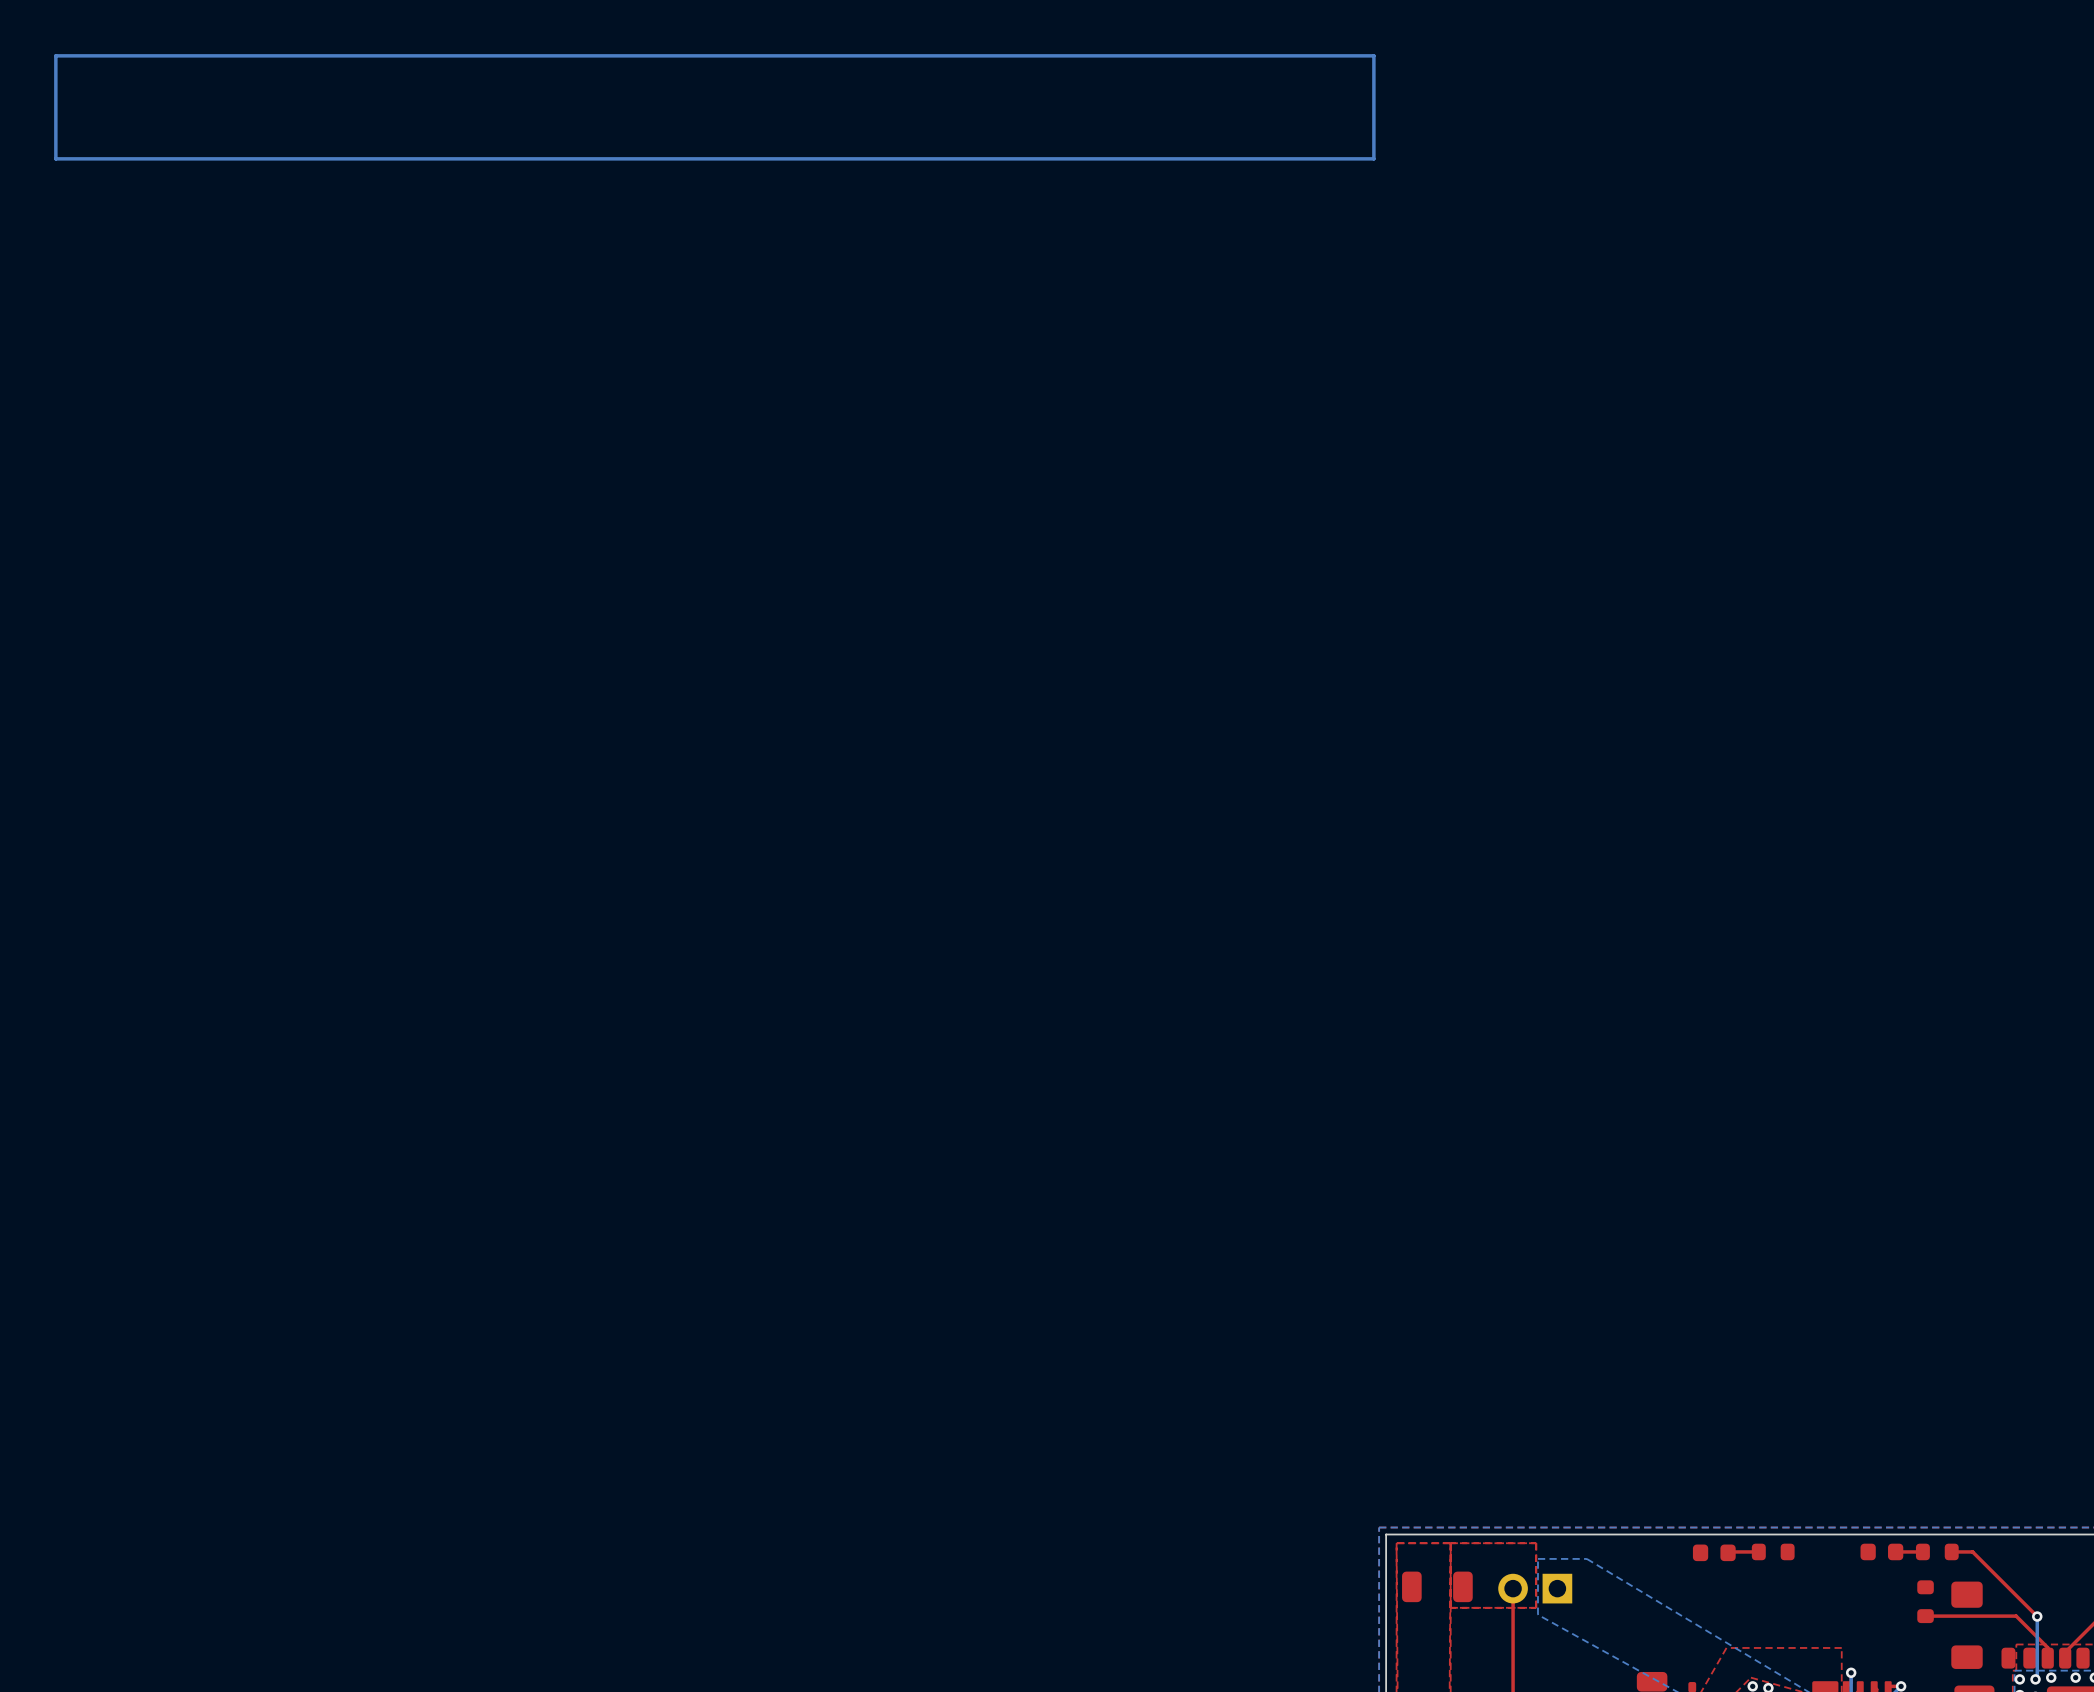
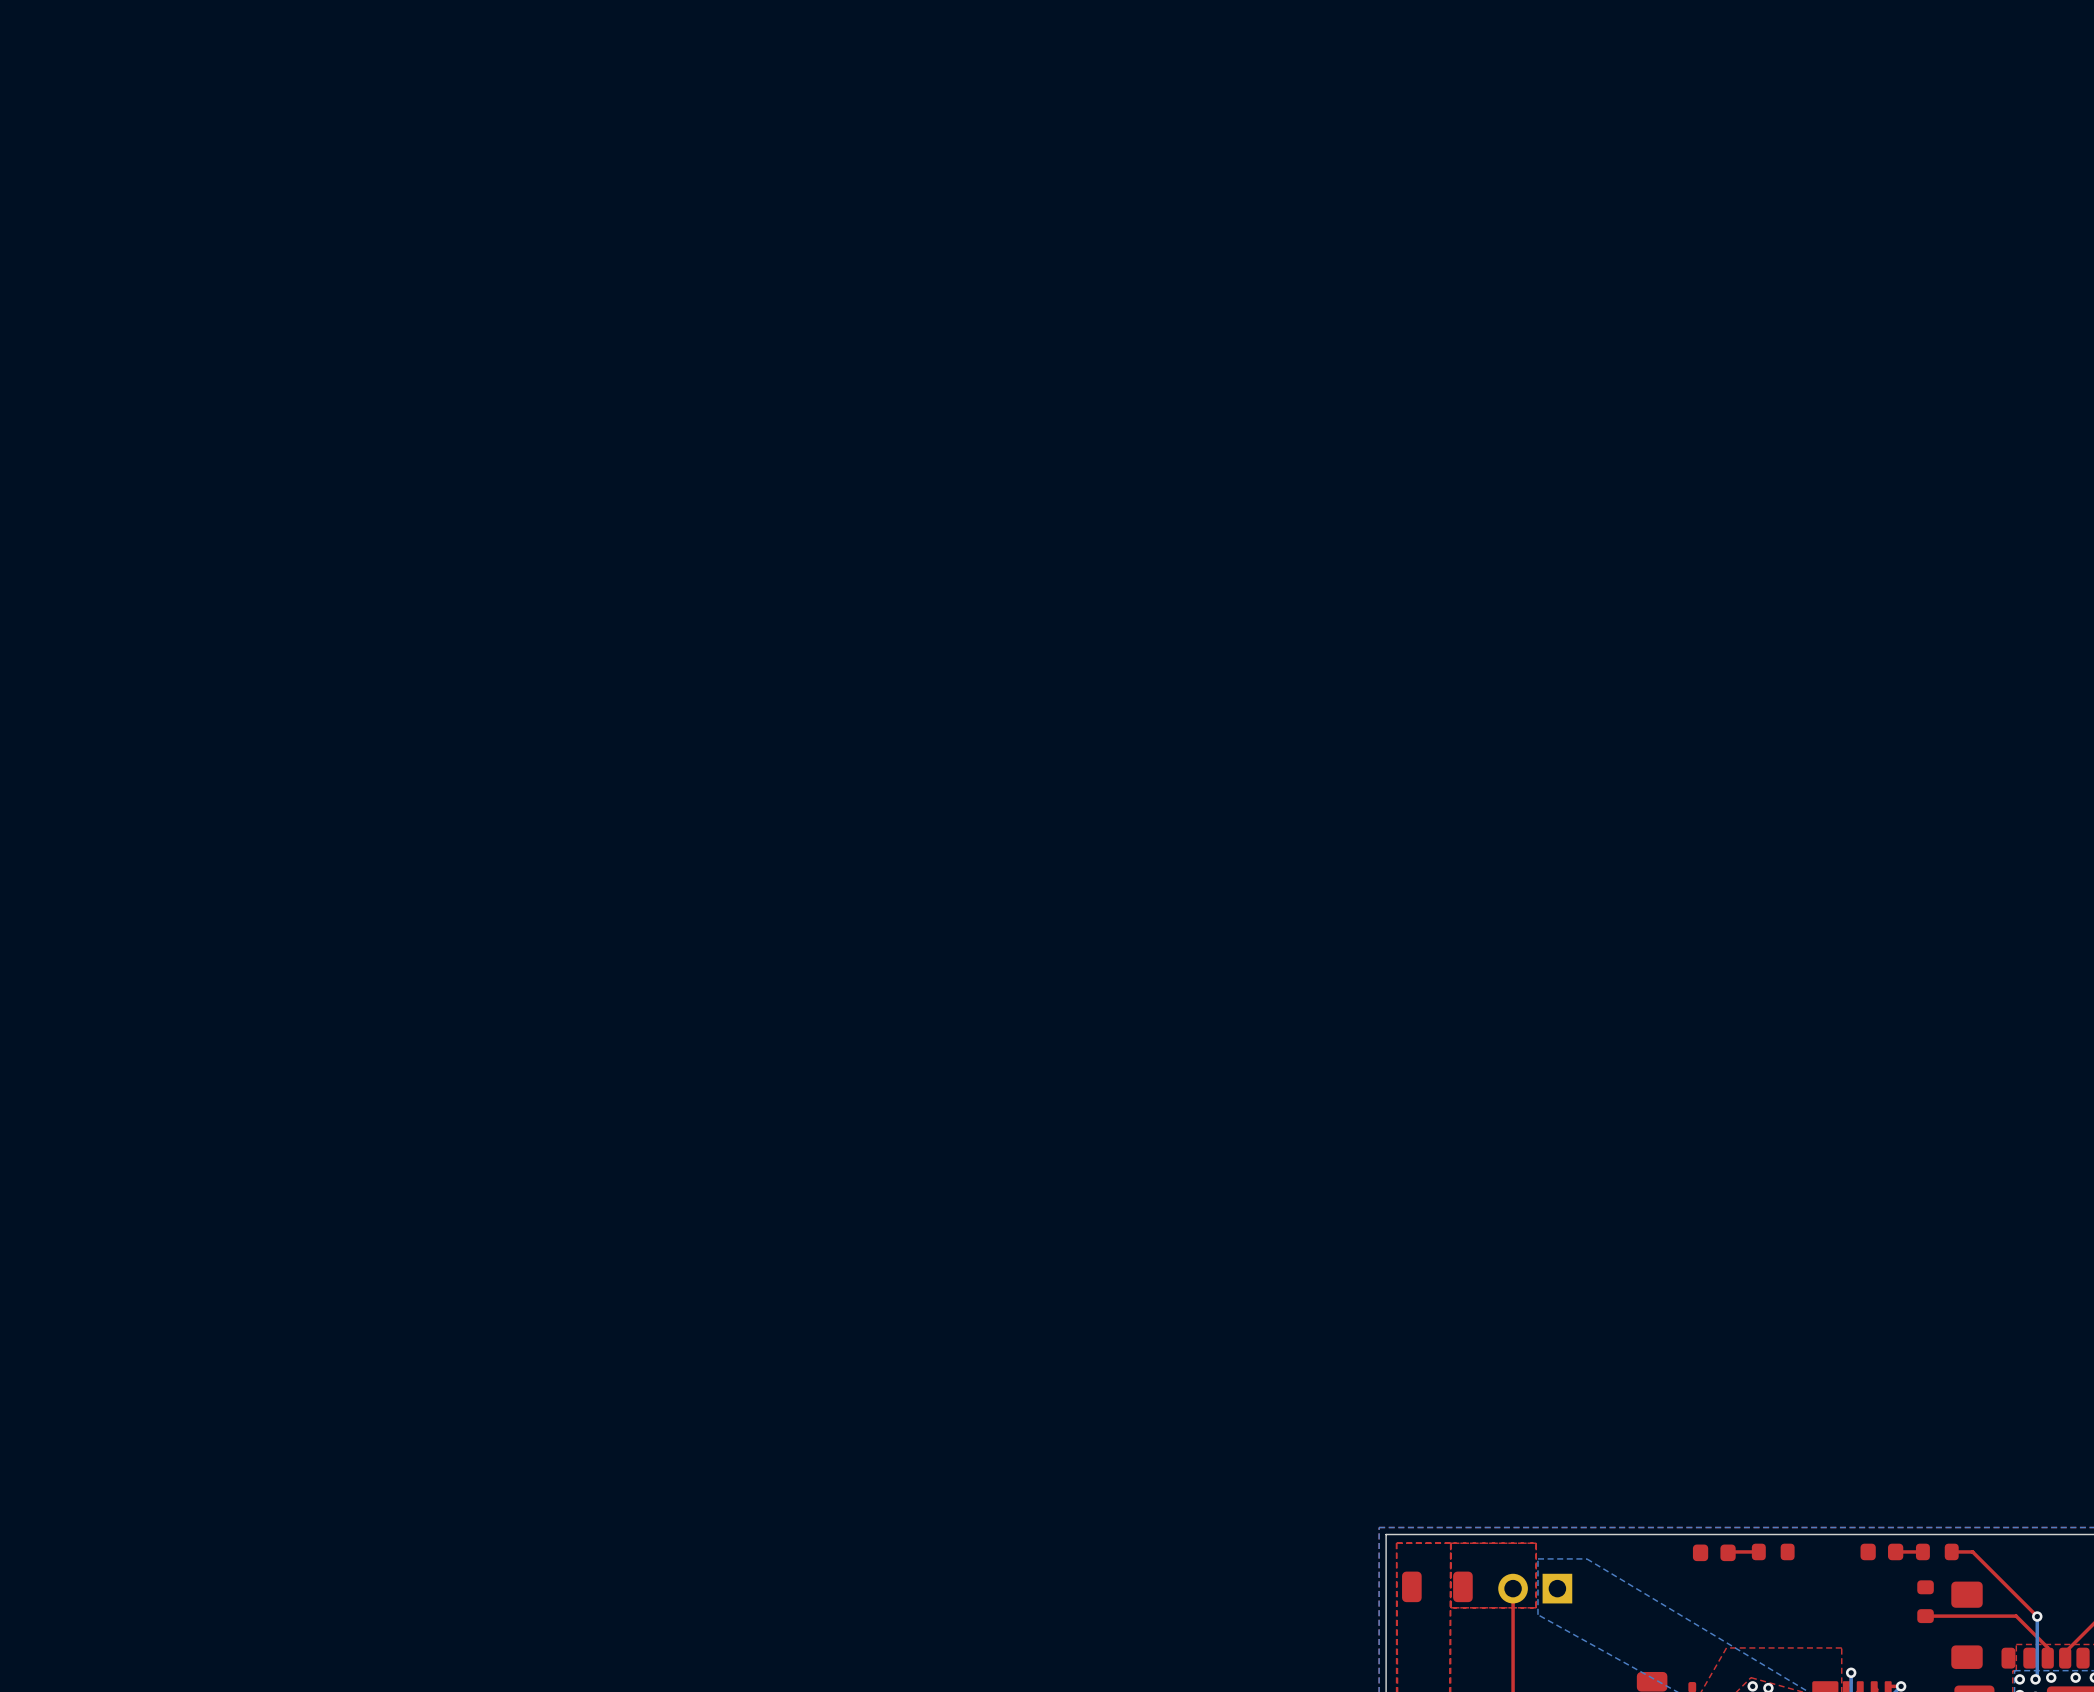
bottom track: (1373, 55) (55, 55) (55, 158) (1373, 158) (1373, 55) -> none

